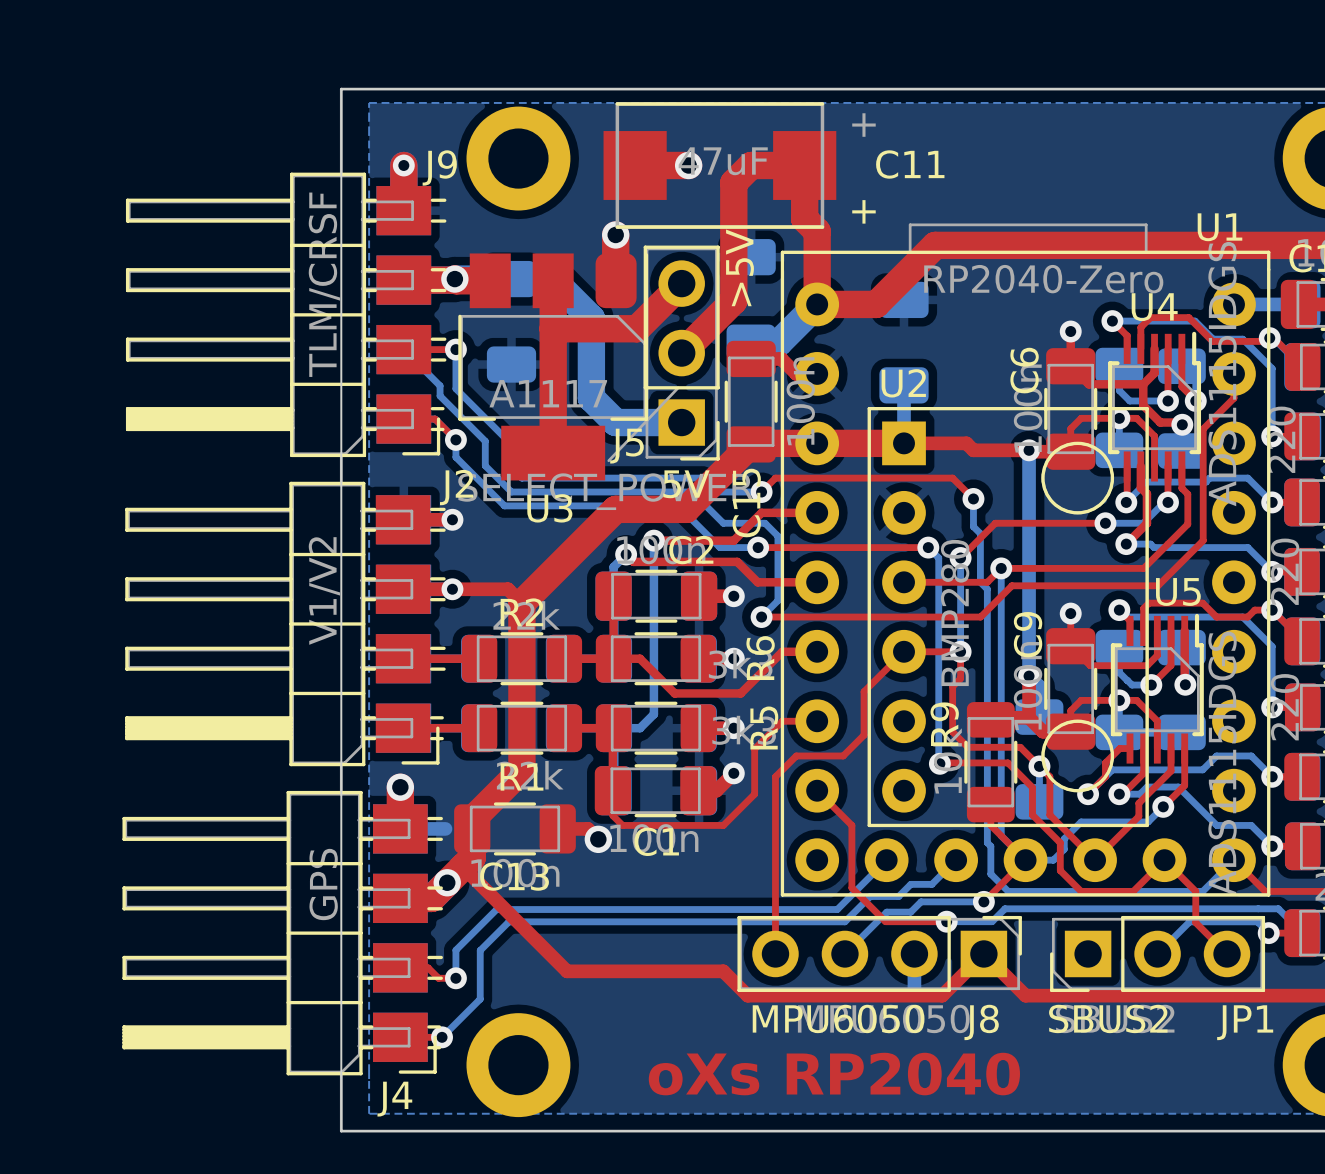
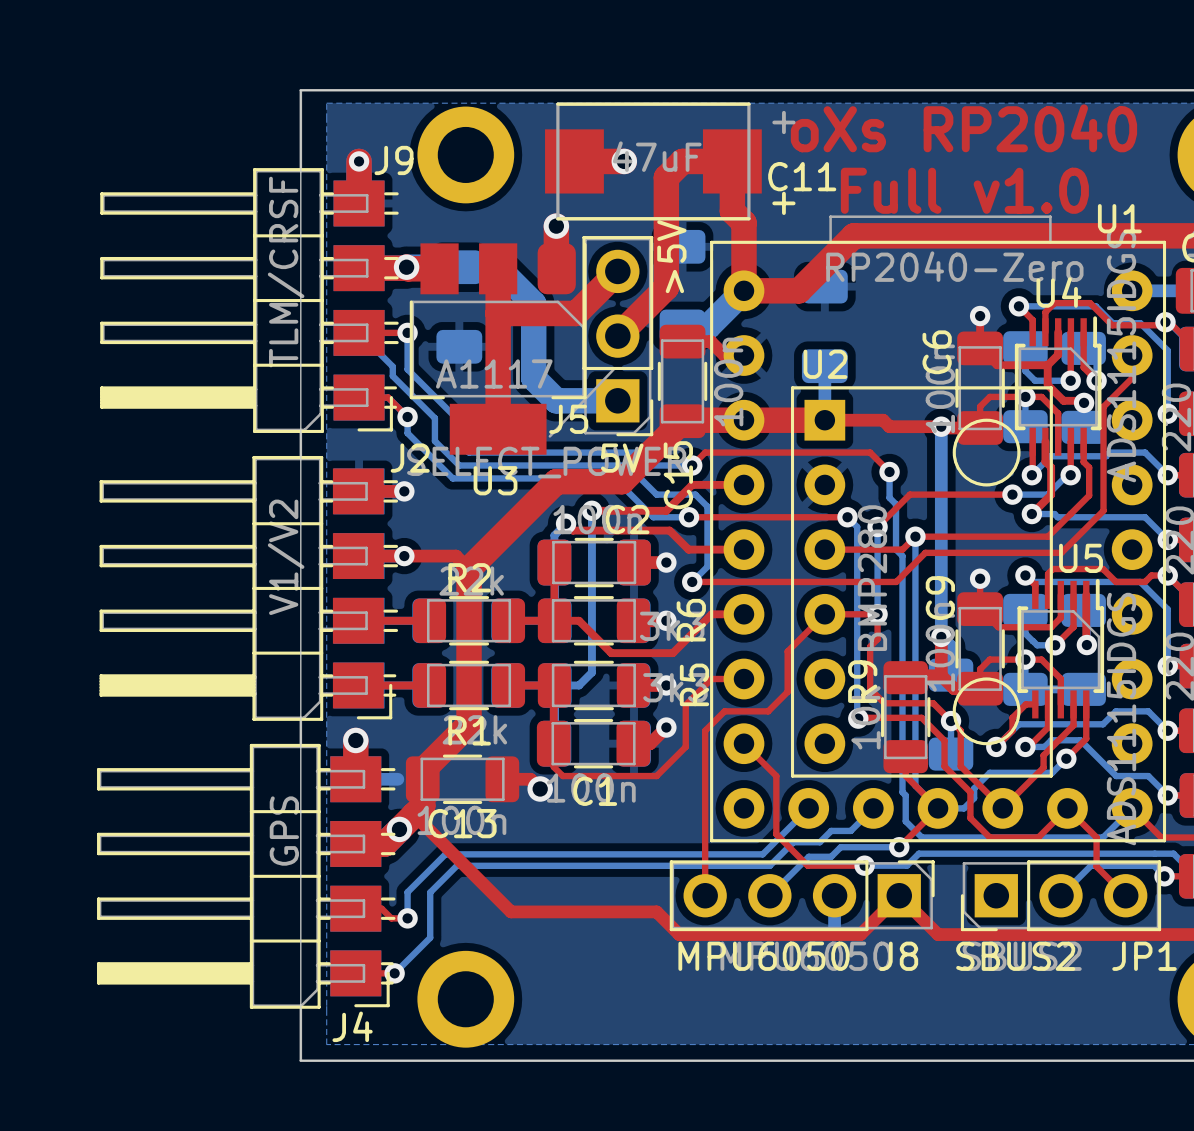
text: none -> oXs RP2040 (963, 128)
C11 name position: C11 (910, 164) -> C11 (802, 176)
text: none -> Full v1.0 (964, 190)
text: oXs RP2040 (834, 1074) -> none

